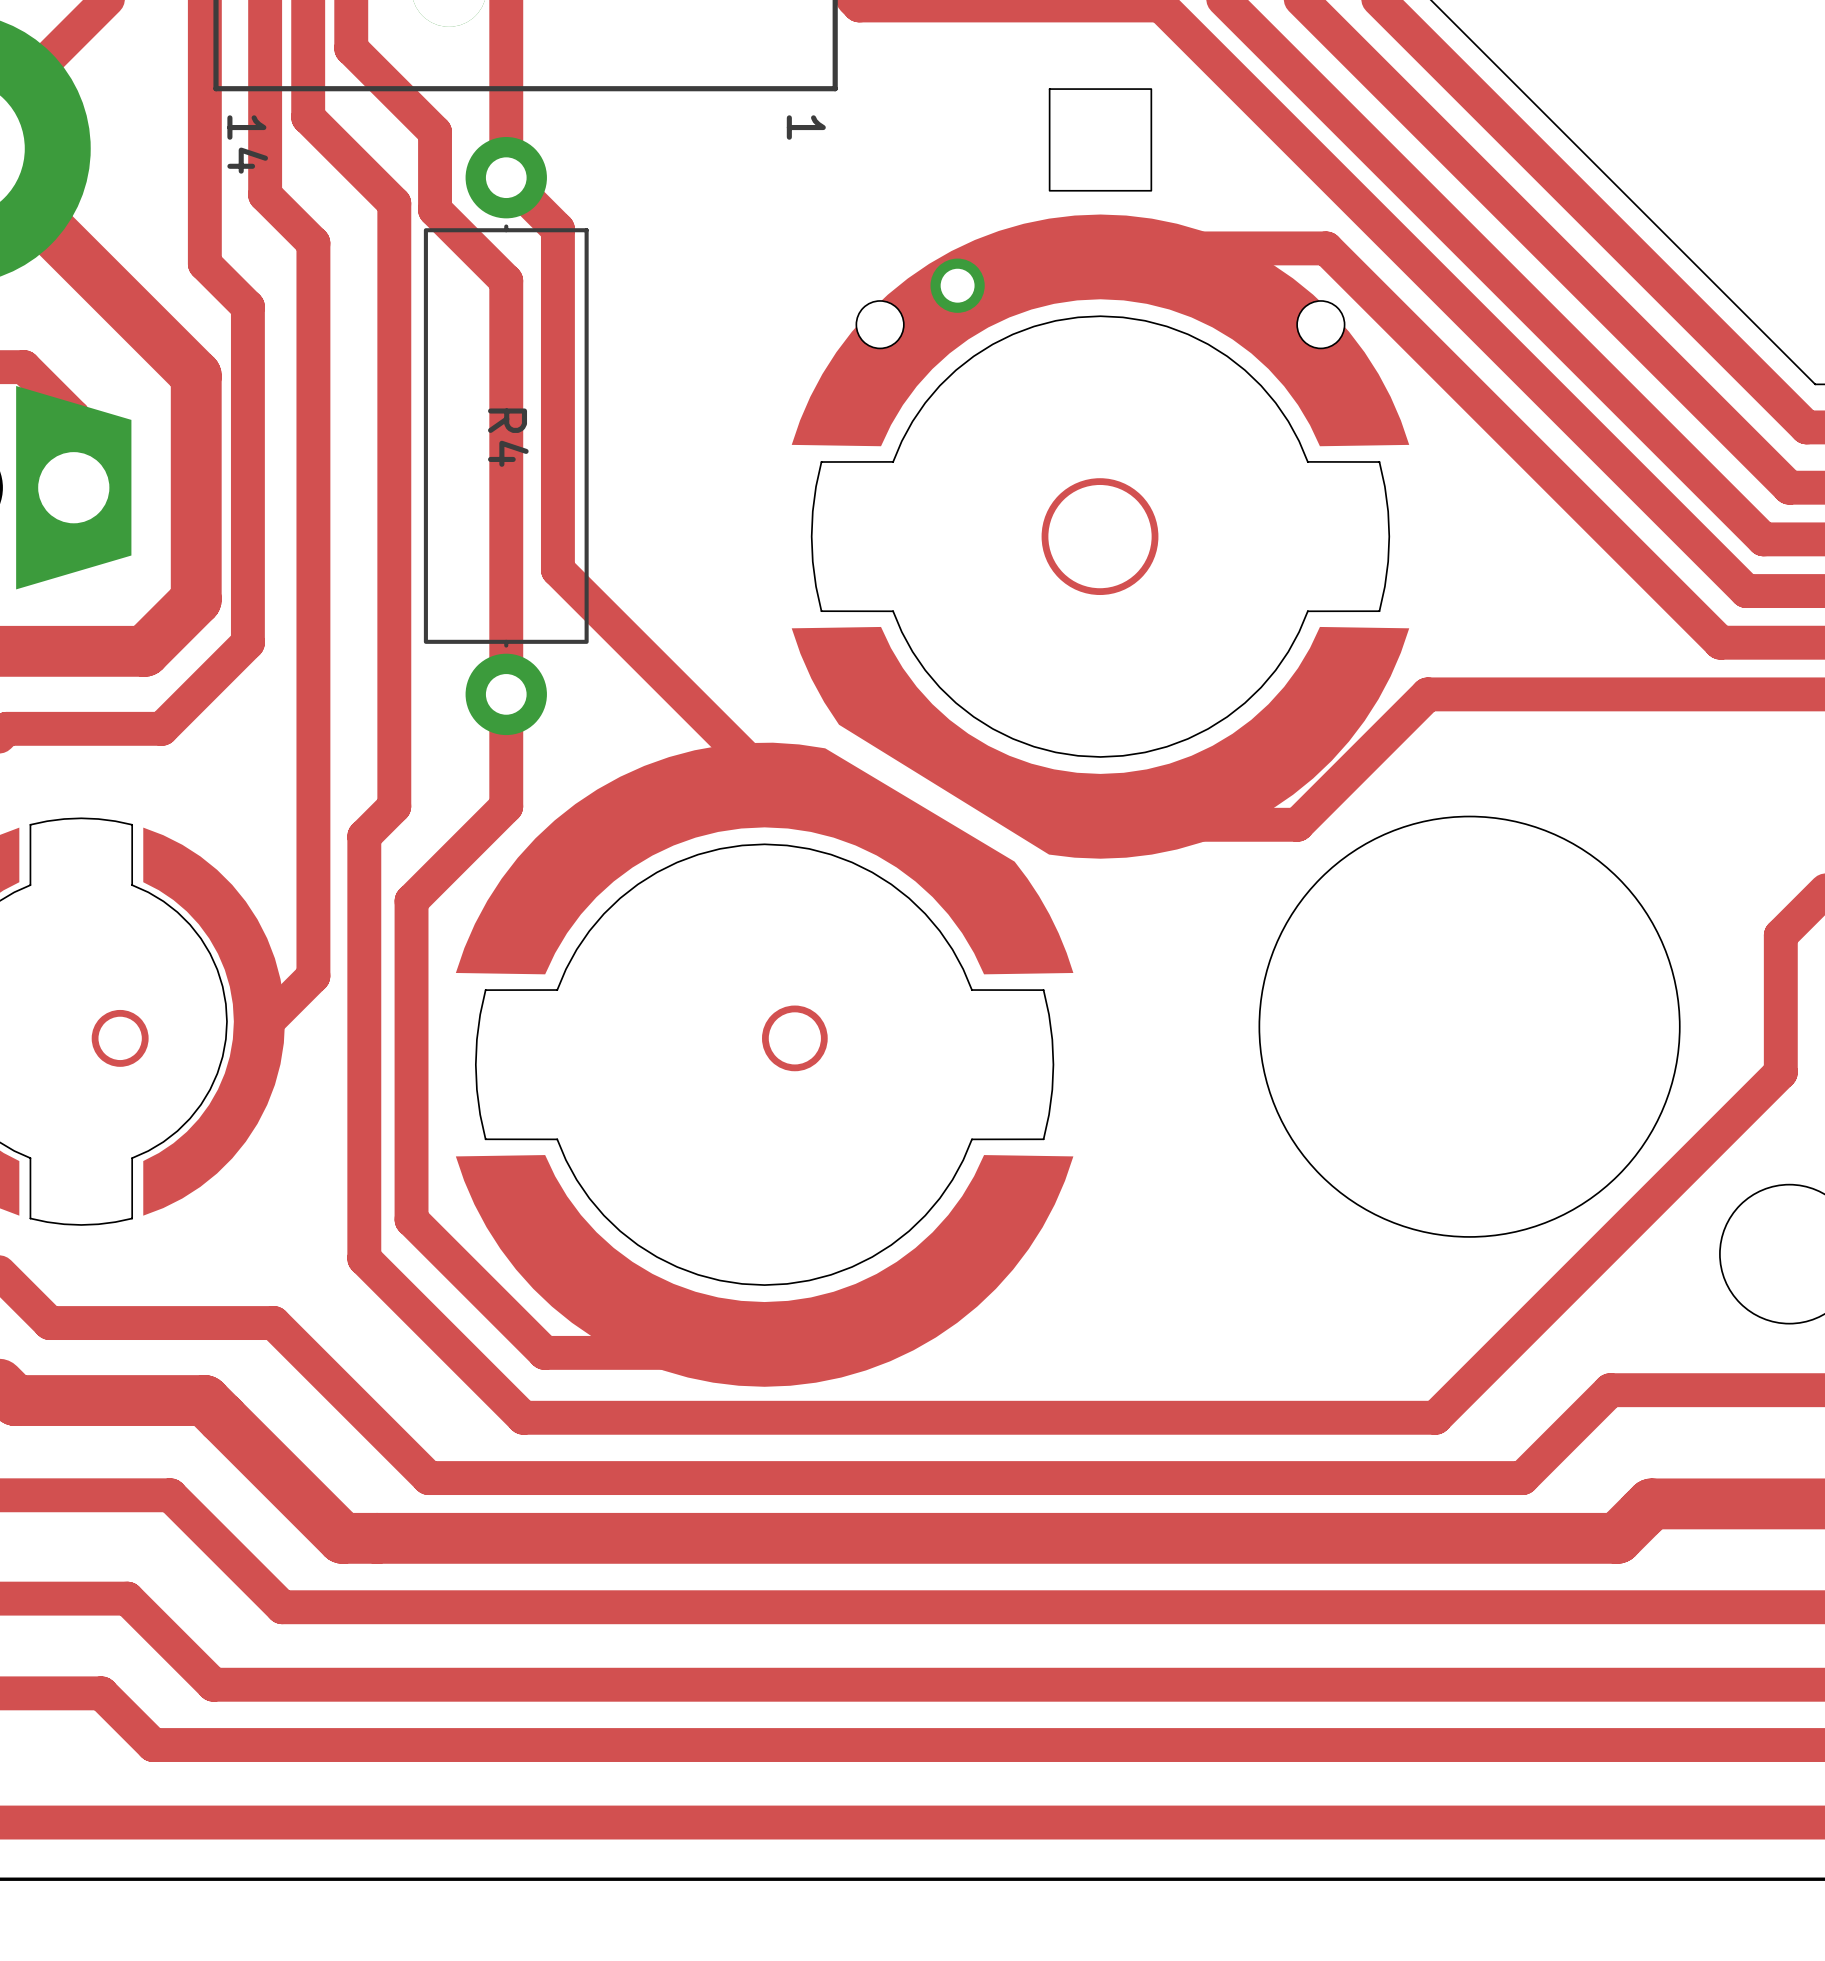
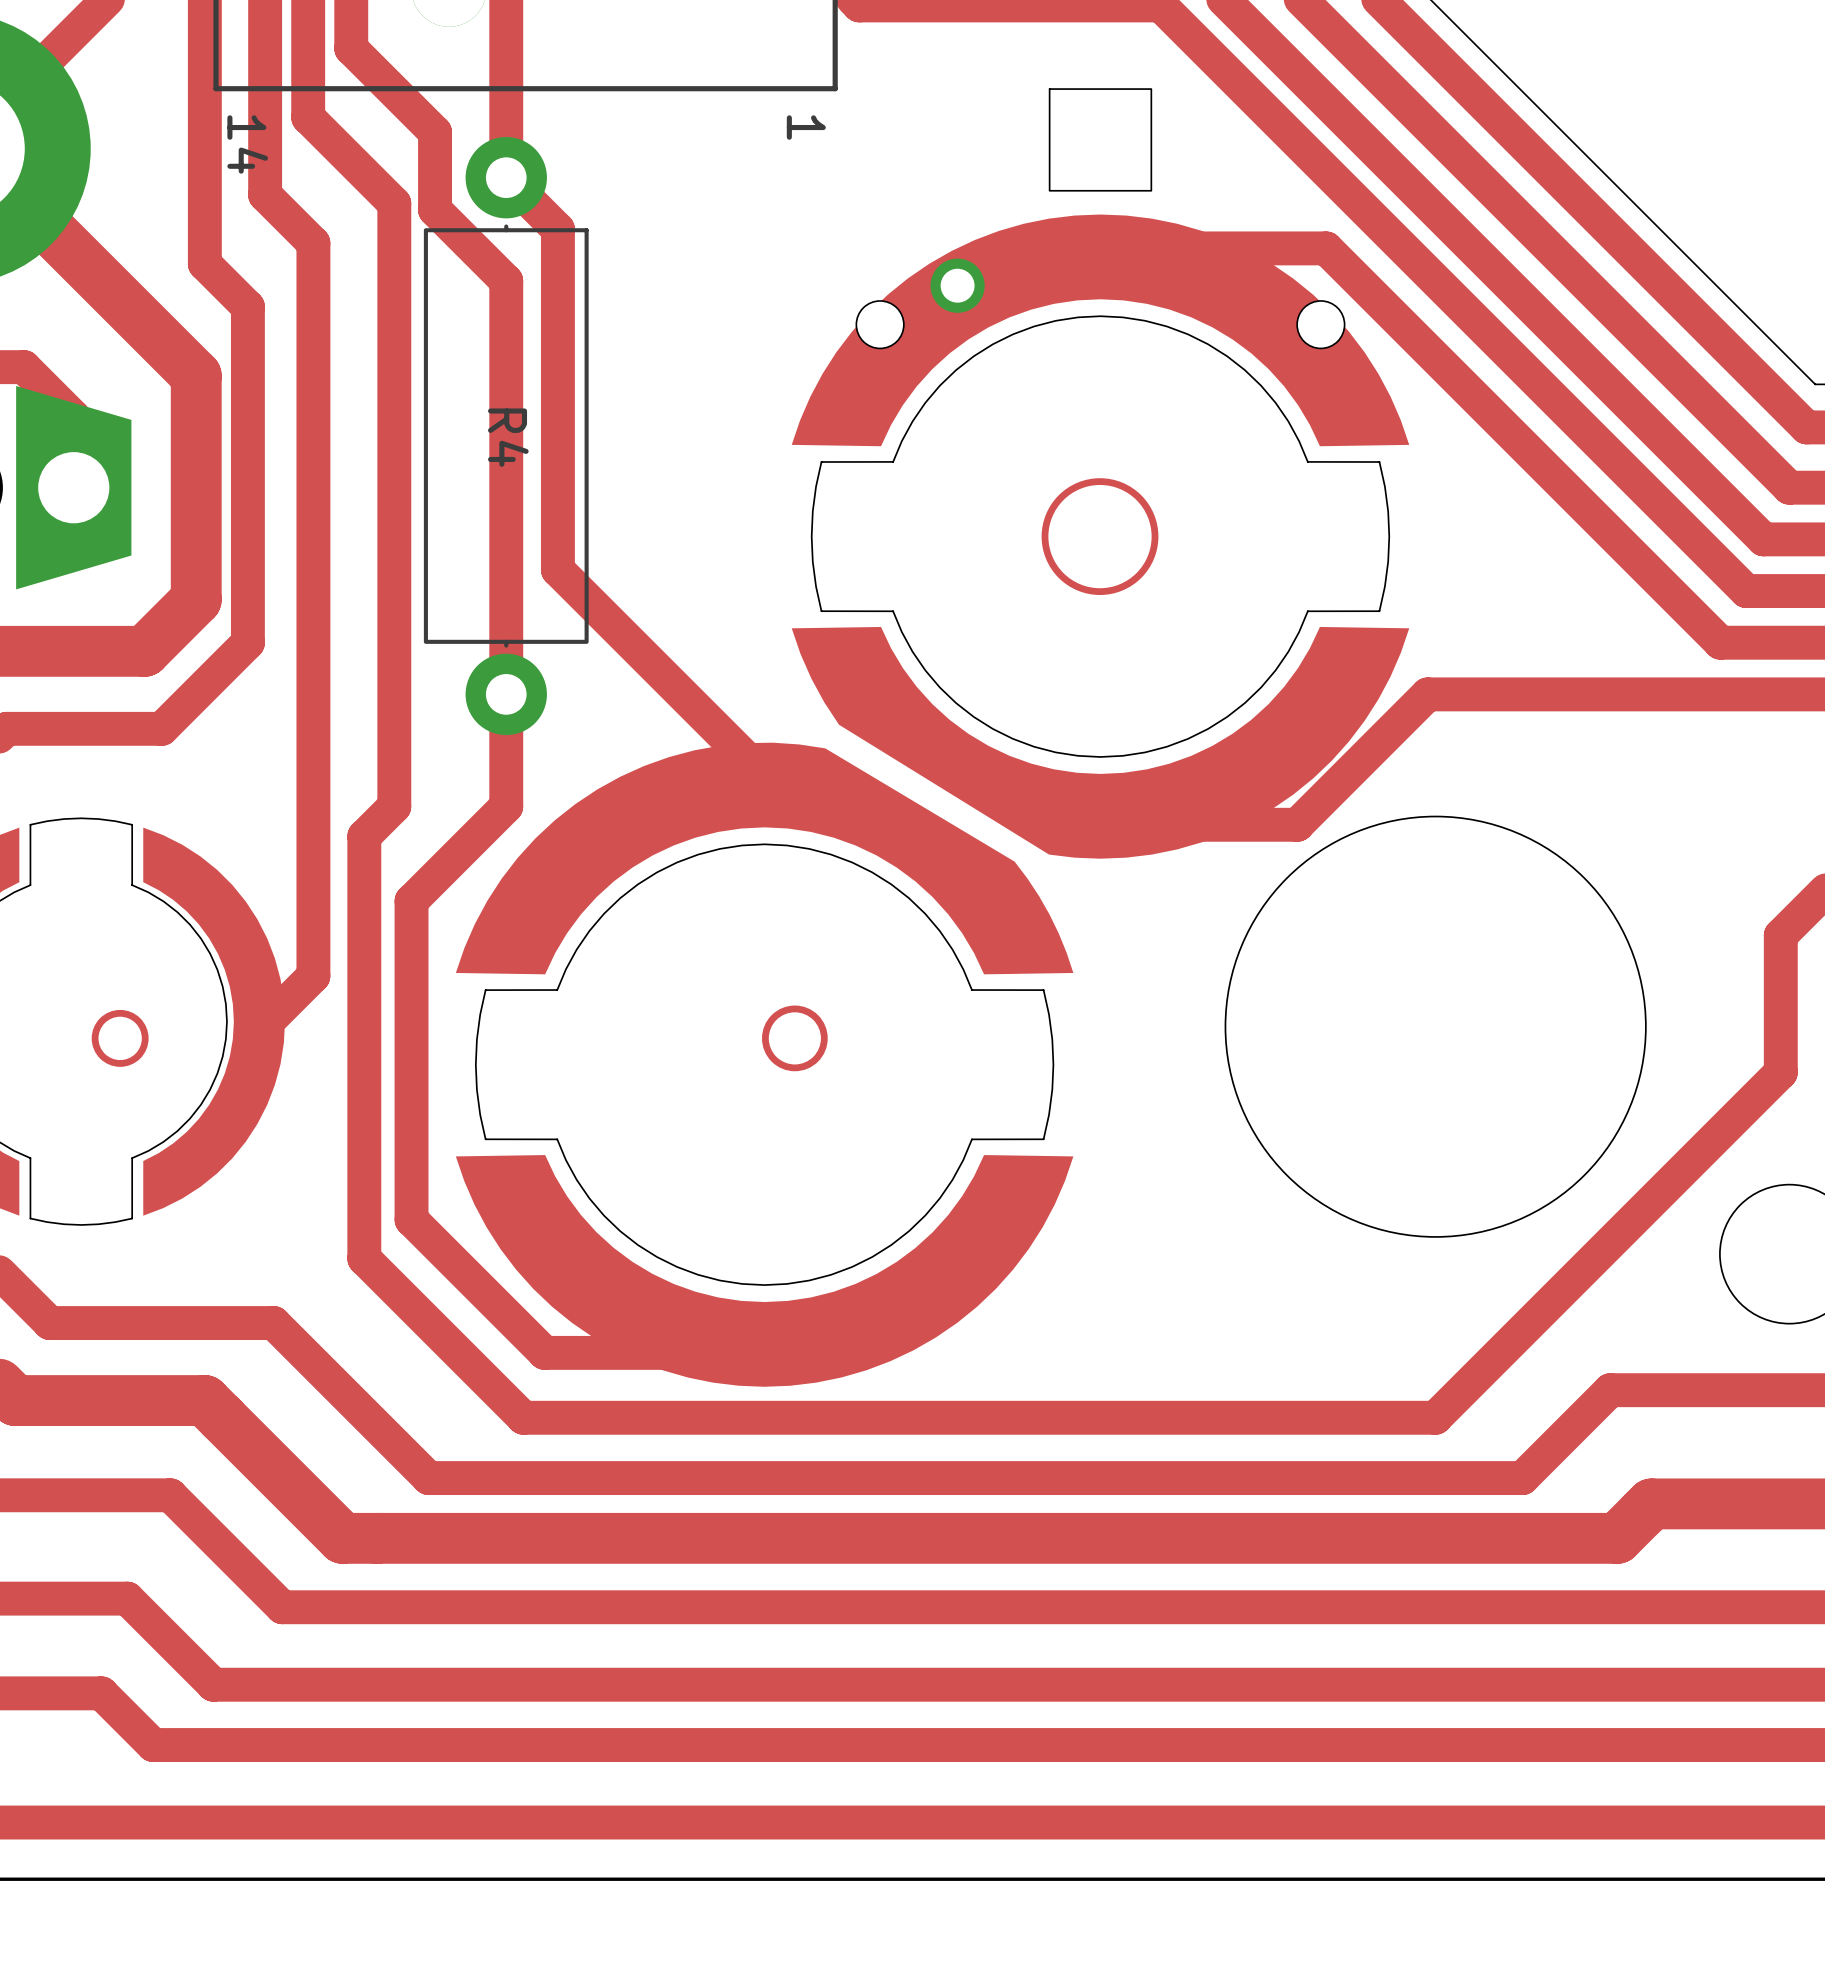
round board edge position: (1469, 1026) -> (1435, 1026)

